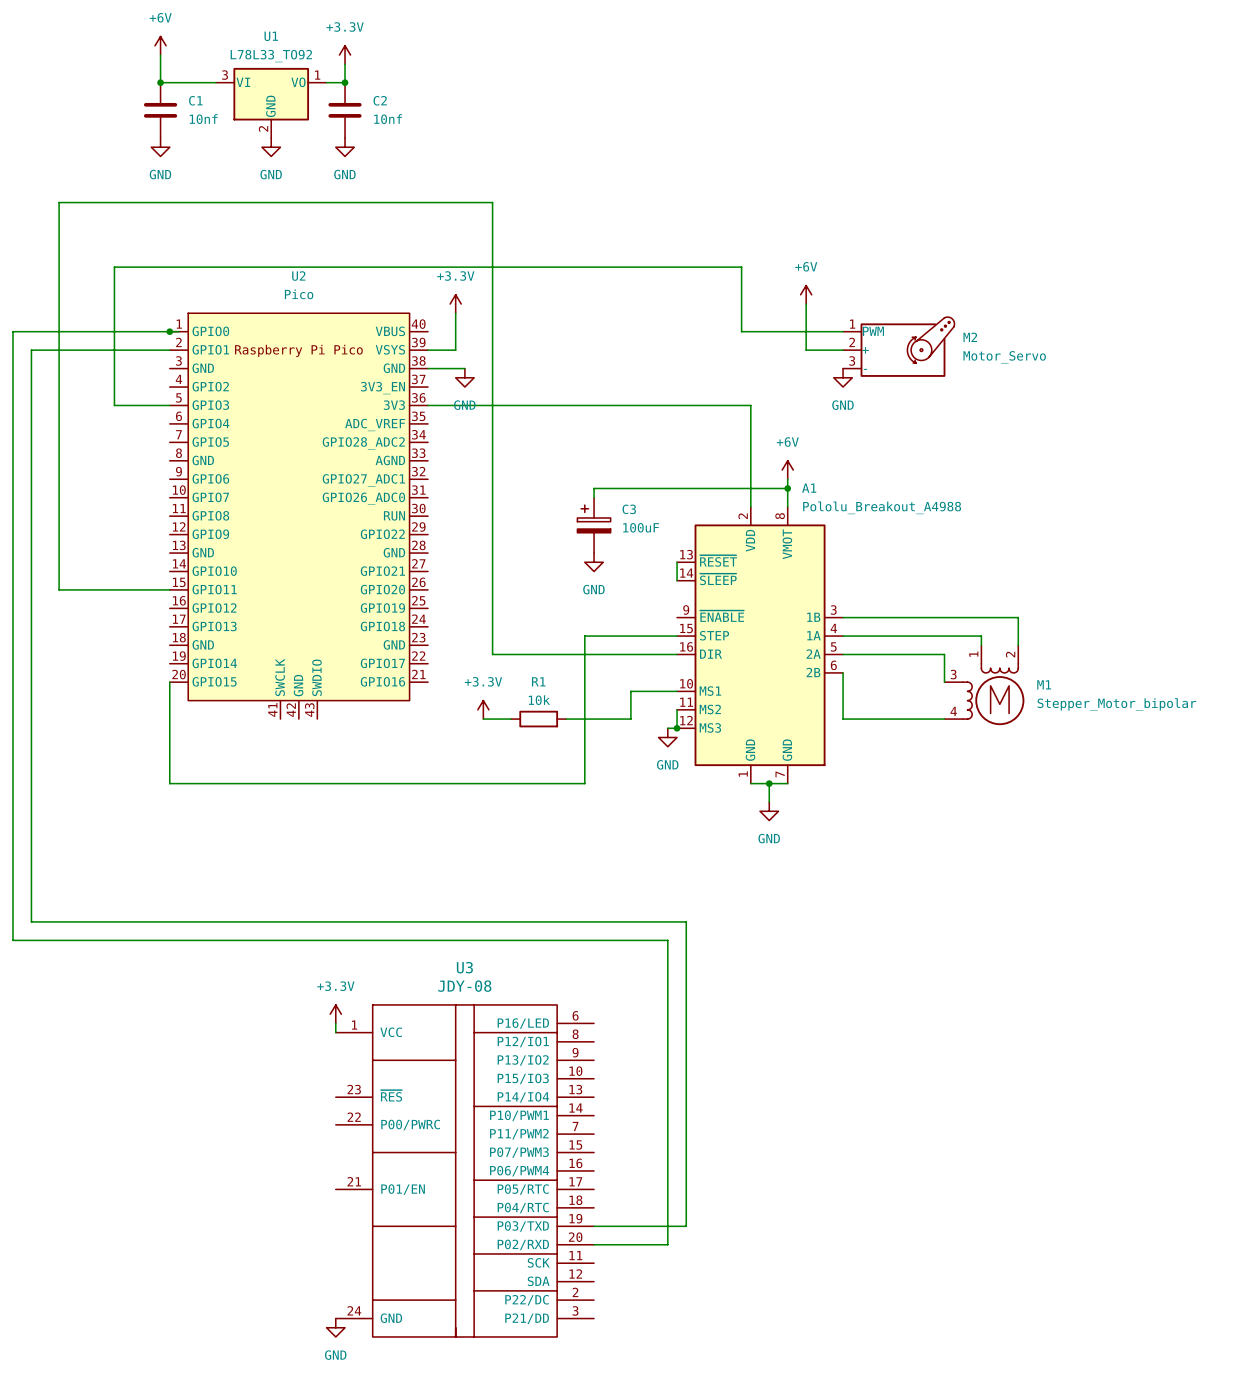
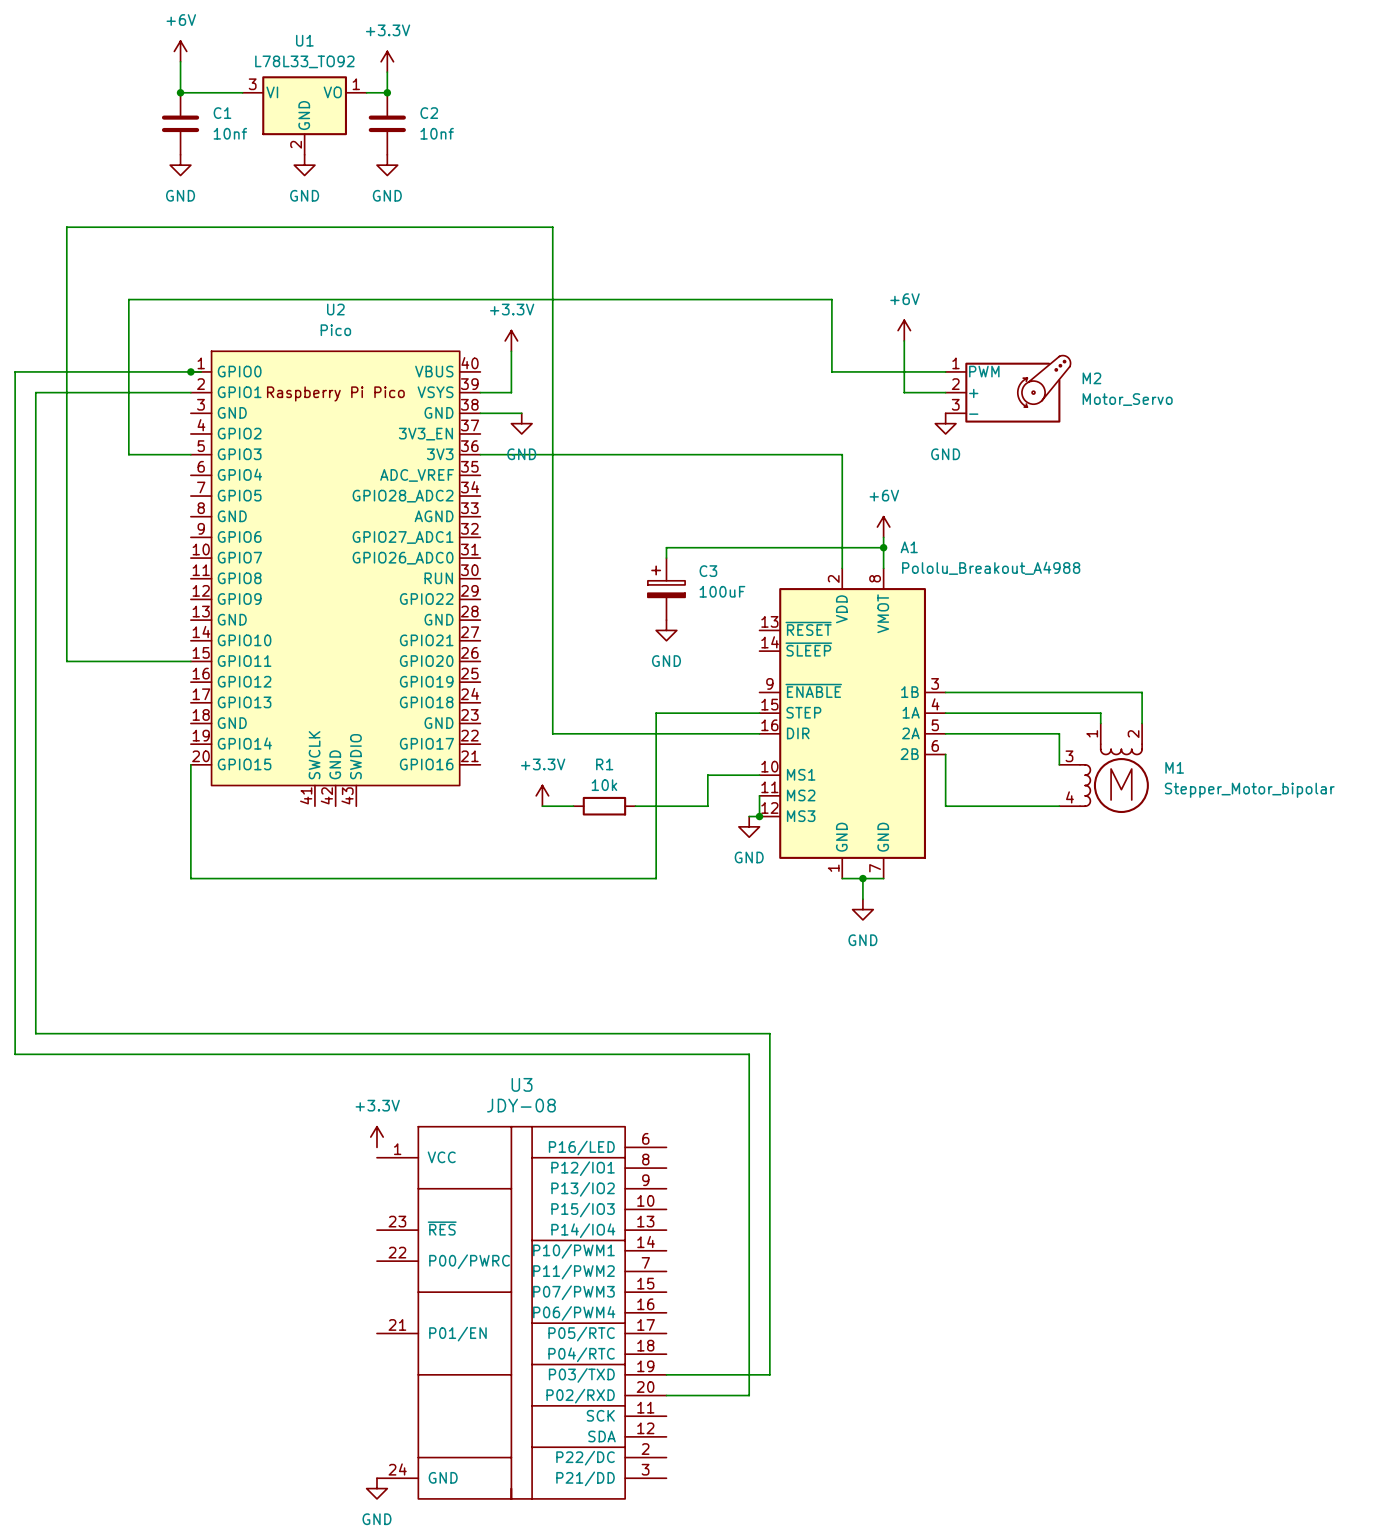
wire: (677, 562) (677, 580) -> none
wire: (335, 1023) (335, 1032) -> none

